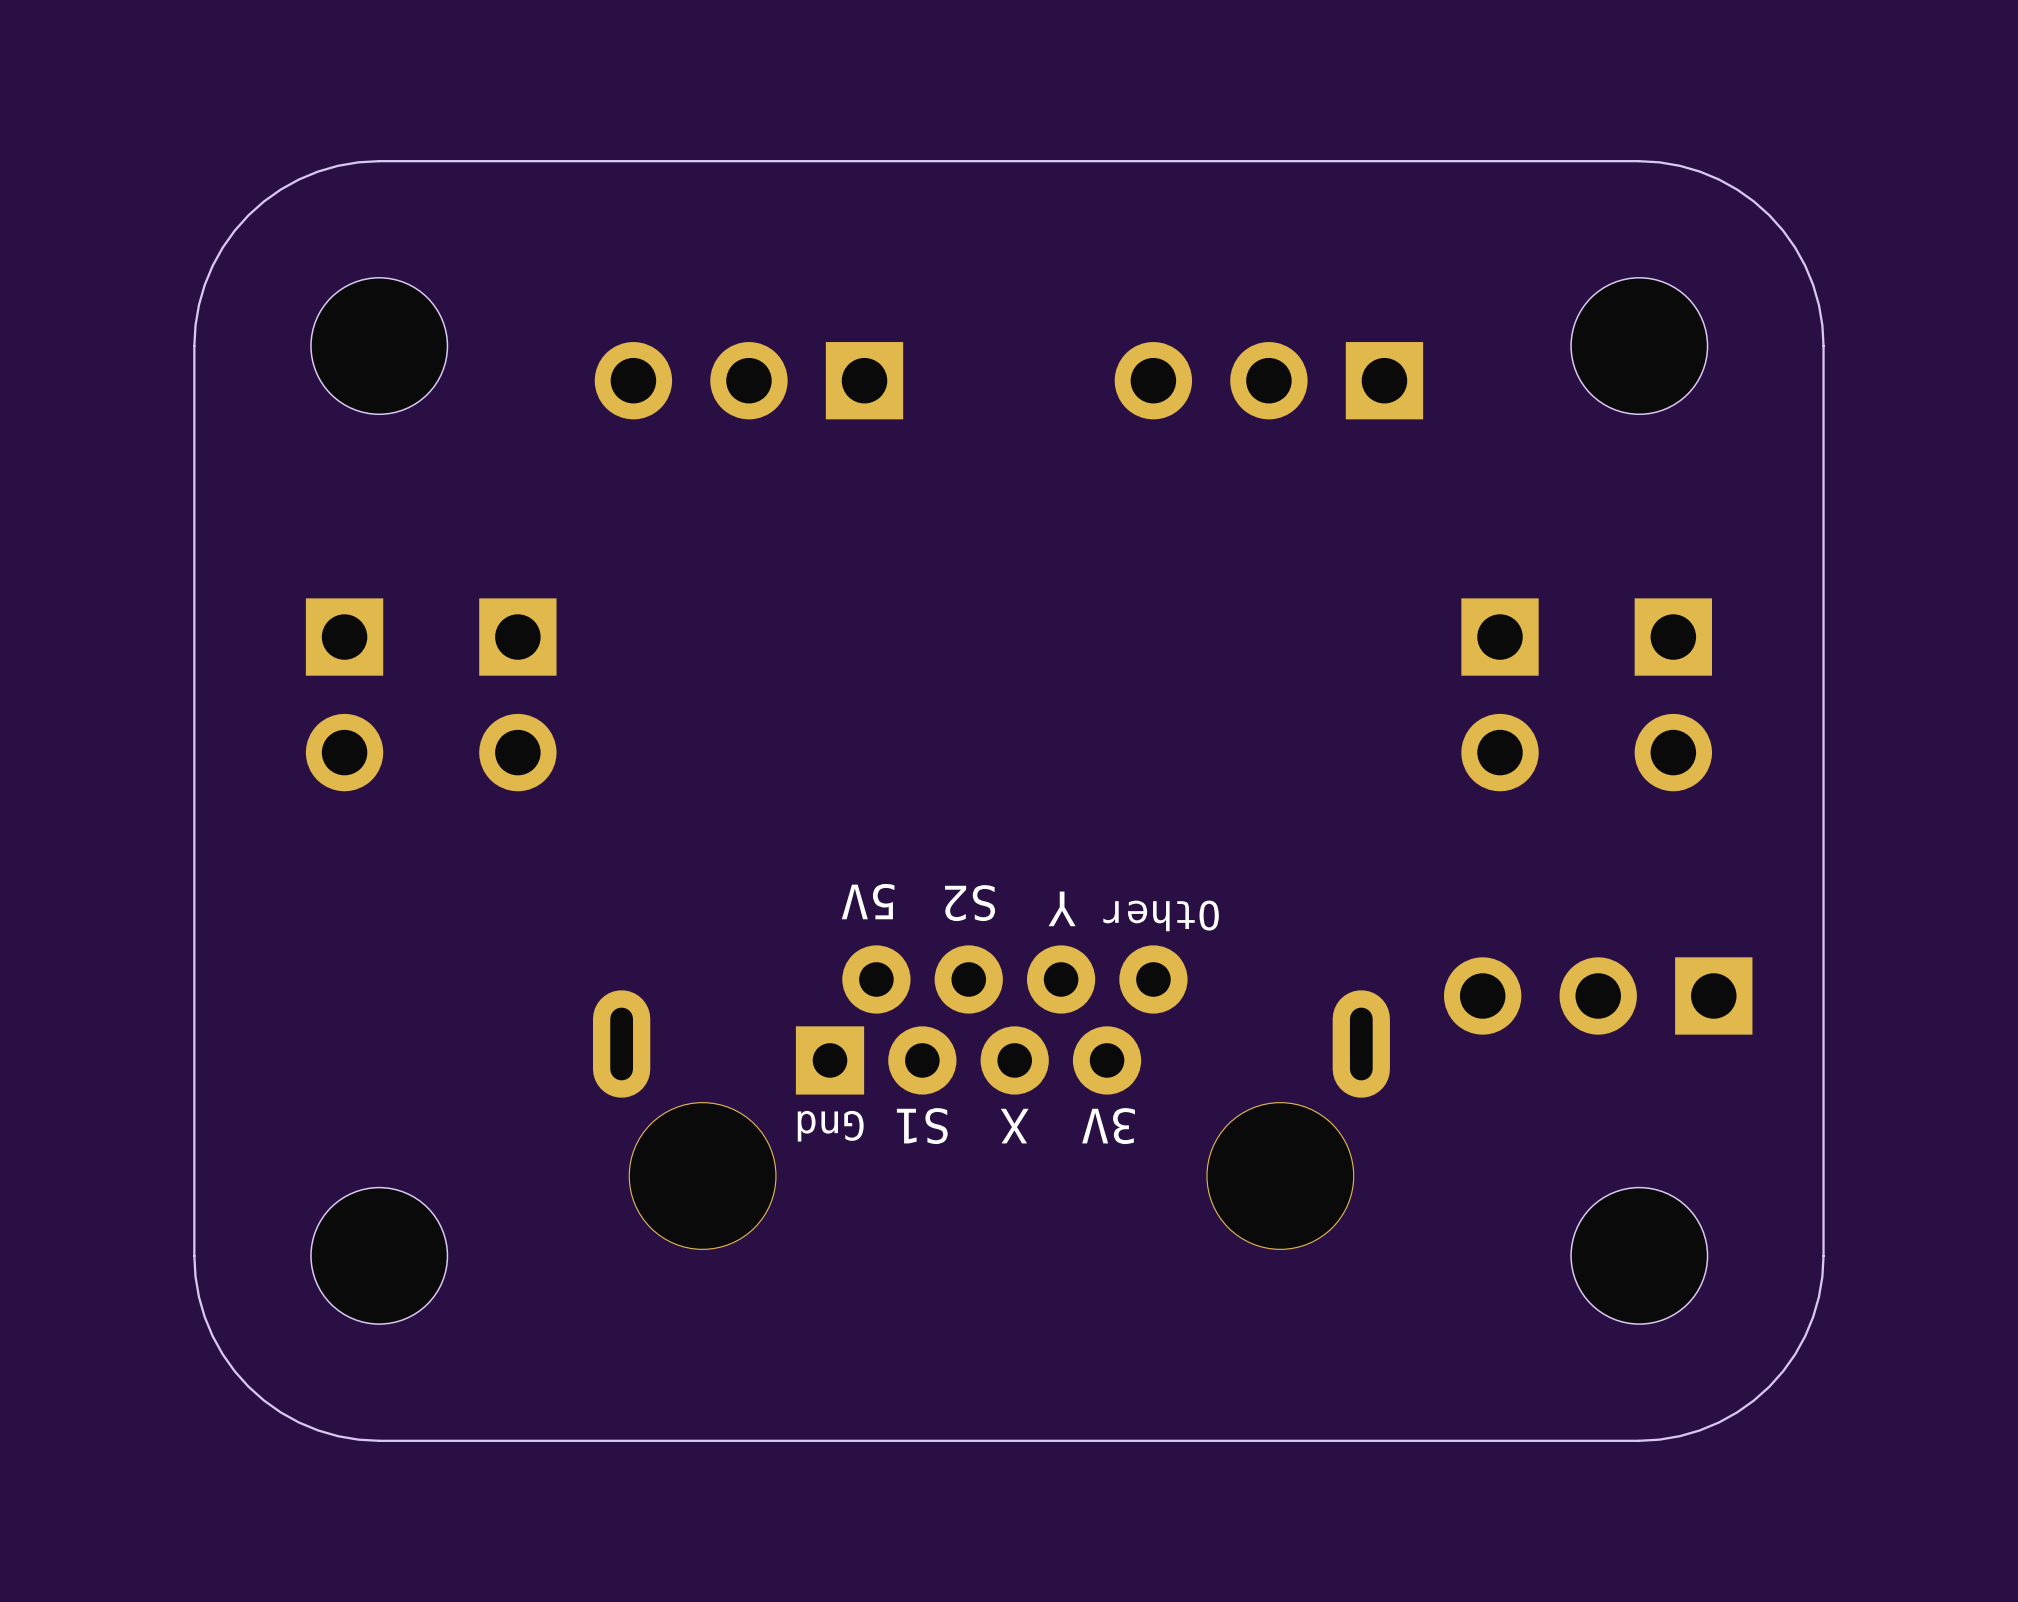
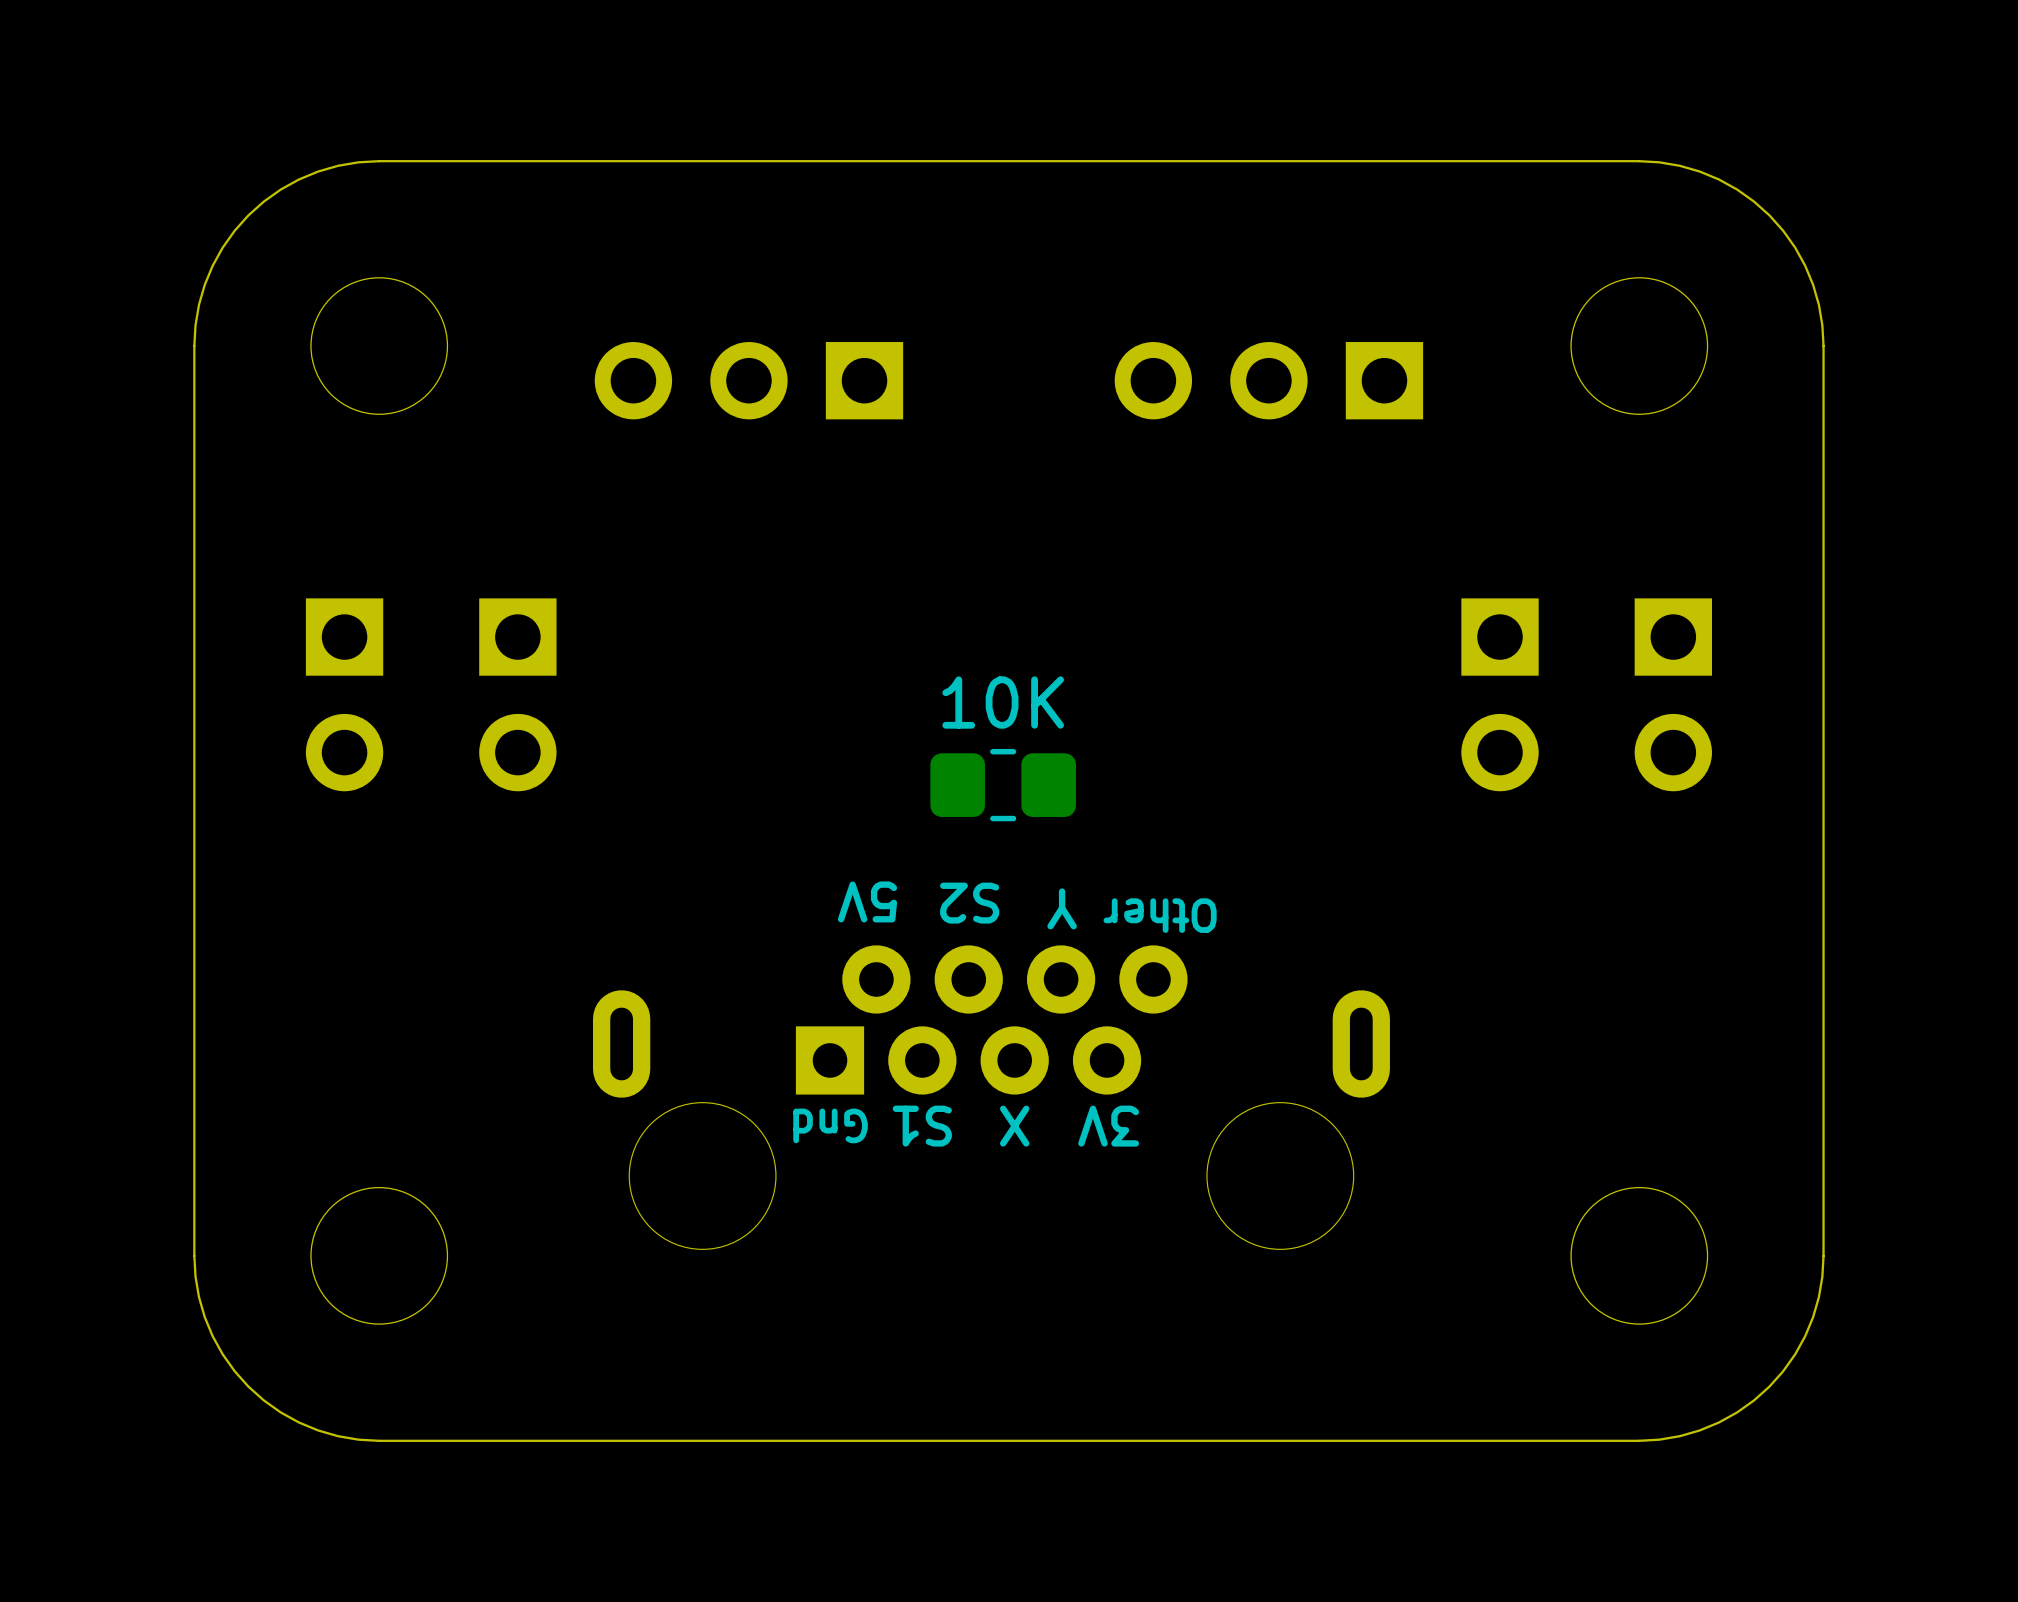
part: none -> 10K (1003, 785)
part: (1598, 995) -> none

